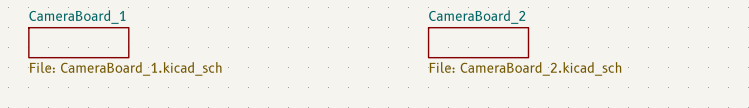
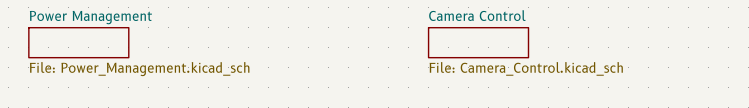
sheet CameraBoard_1 name: CameraBoard_1 (77, 17) -> Power Management (90, 17)
sheet CameraBoard_2 name: CameraBoard_2 (477, 17) -> Camera Control (477, 15)
sheet CameraBoard_1 value: File: CameraBoard_1.kicad_sch (125, 68) -> File: Power_Management.kicad_sch (139, 69)
sheet CameraBoard_2 value: File: CameraBoard_2.kicad_sch (525, 68) -> File: Camera_Control.kicad_sch (526, 68)

